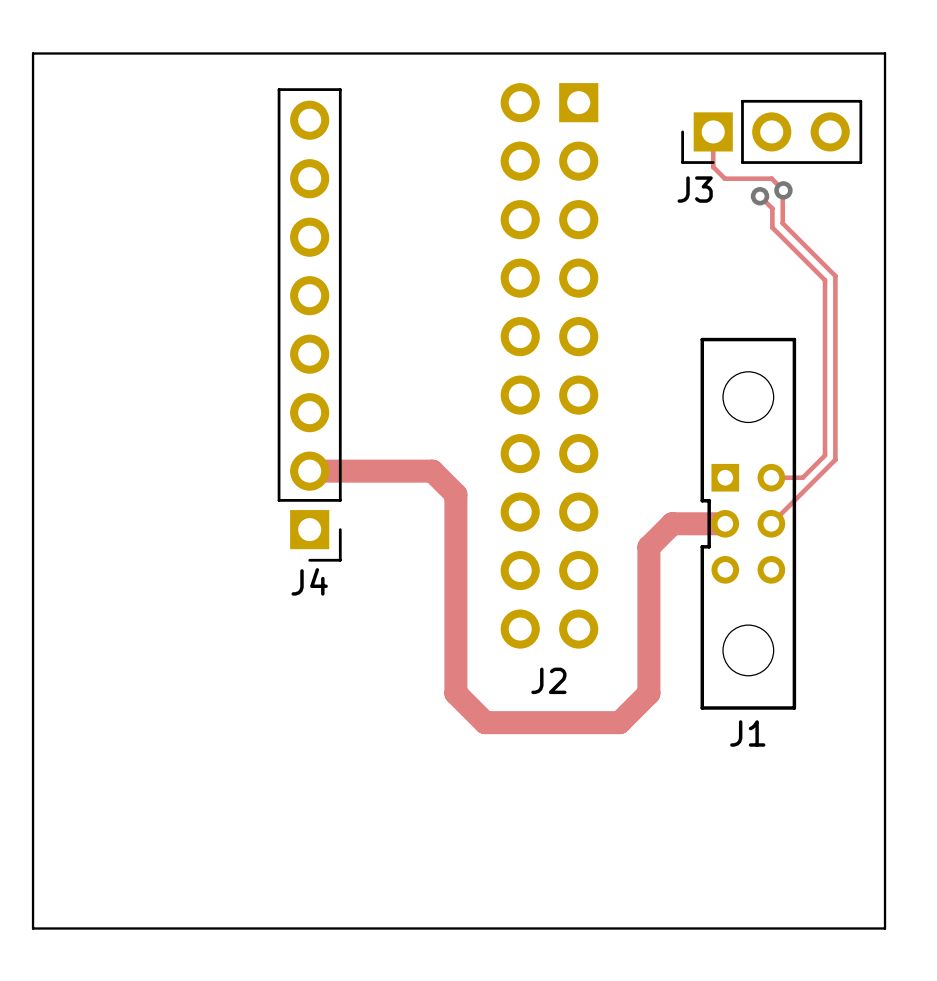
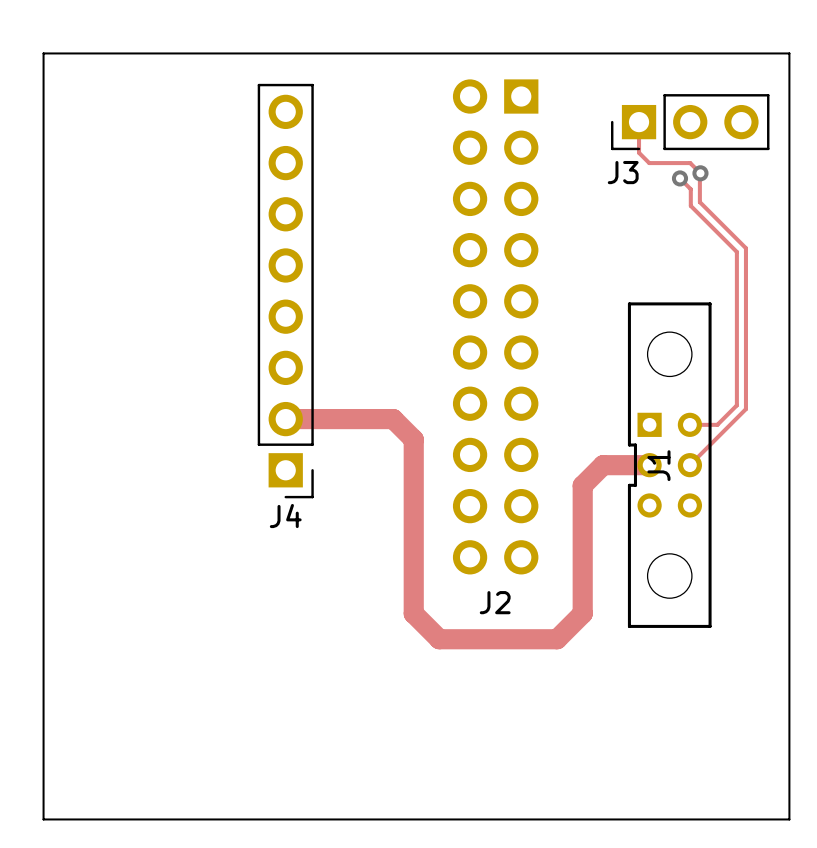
J1 name rotation: 0° (747, 733) -> 90° counterclockwise (658, 465)
J1 name position: J1 (747, 733) -> J1 (658, 465)

